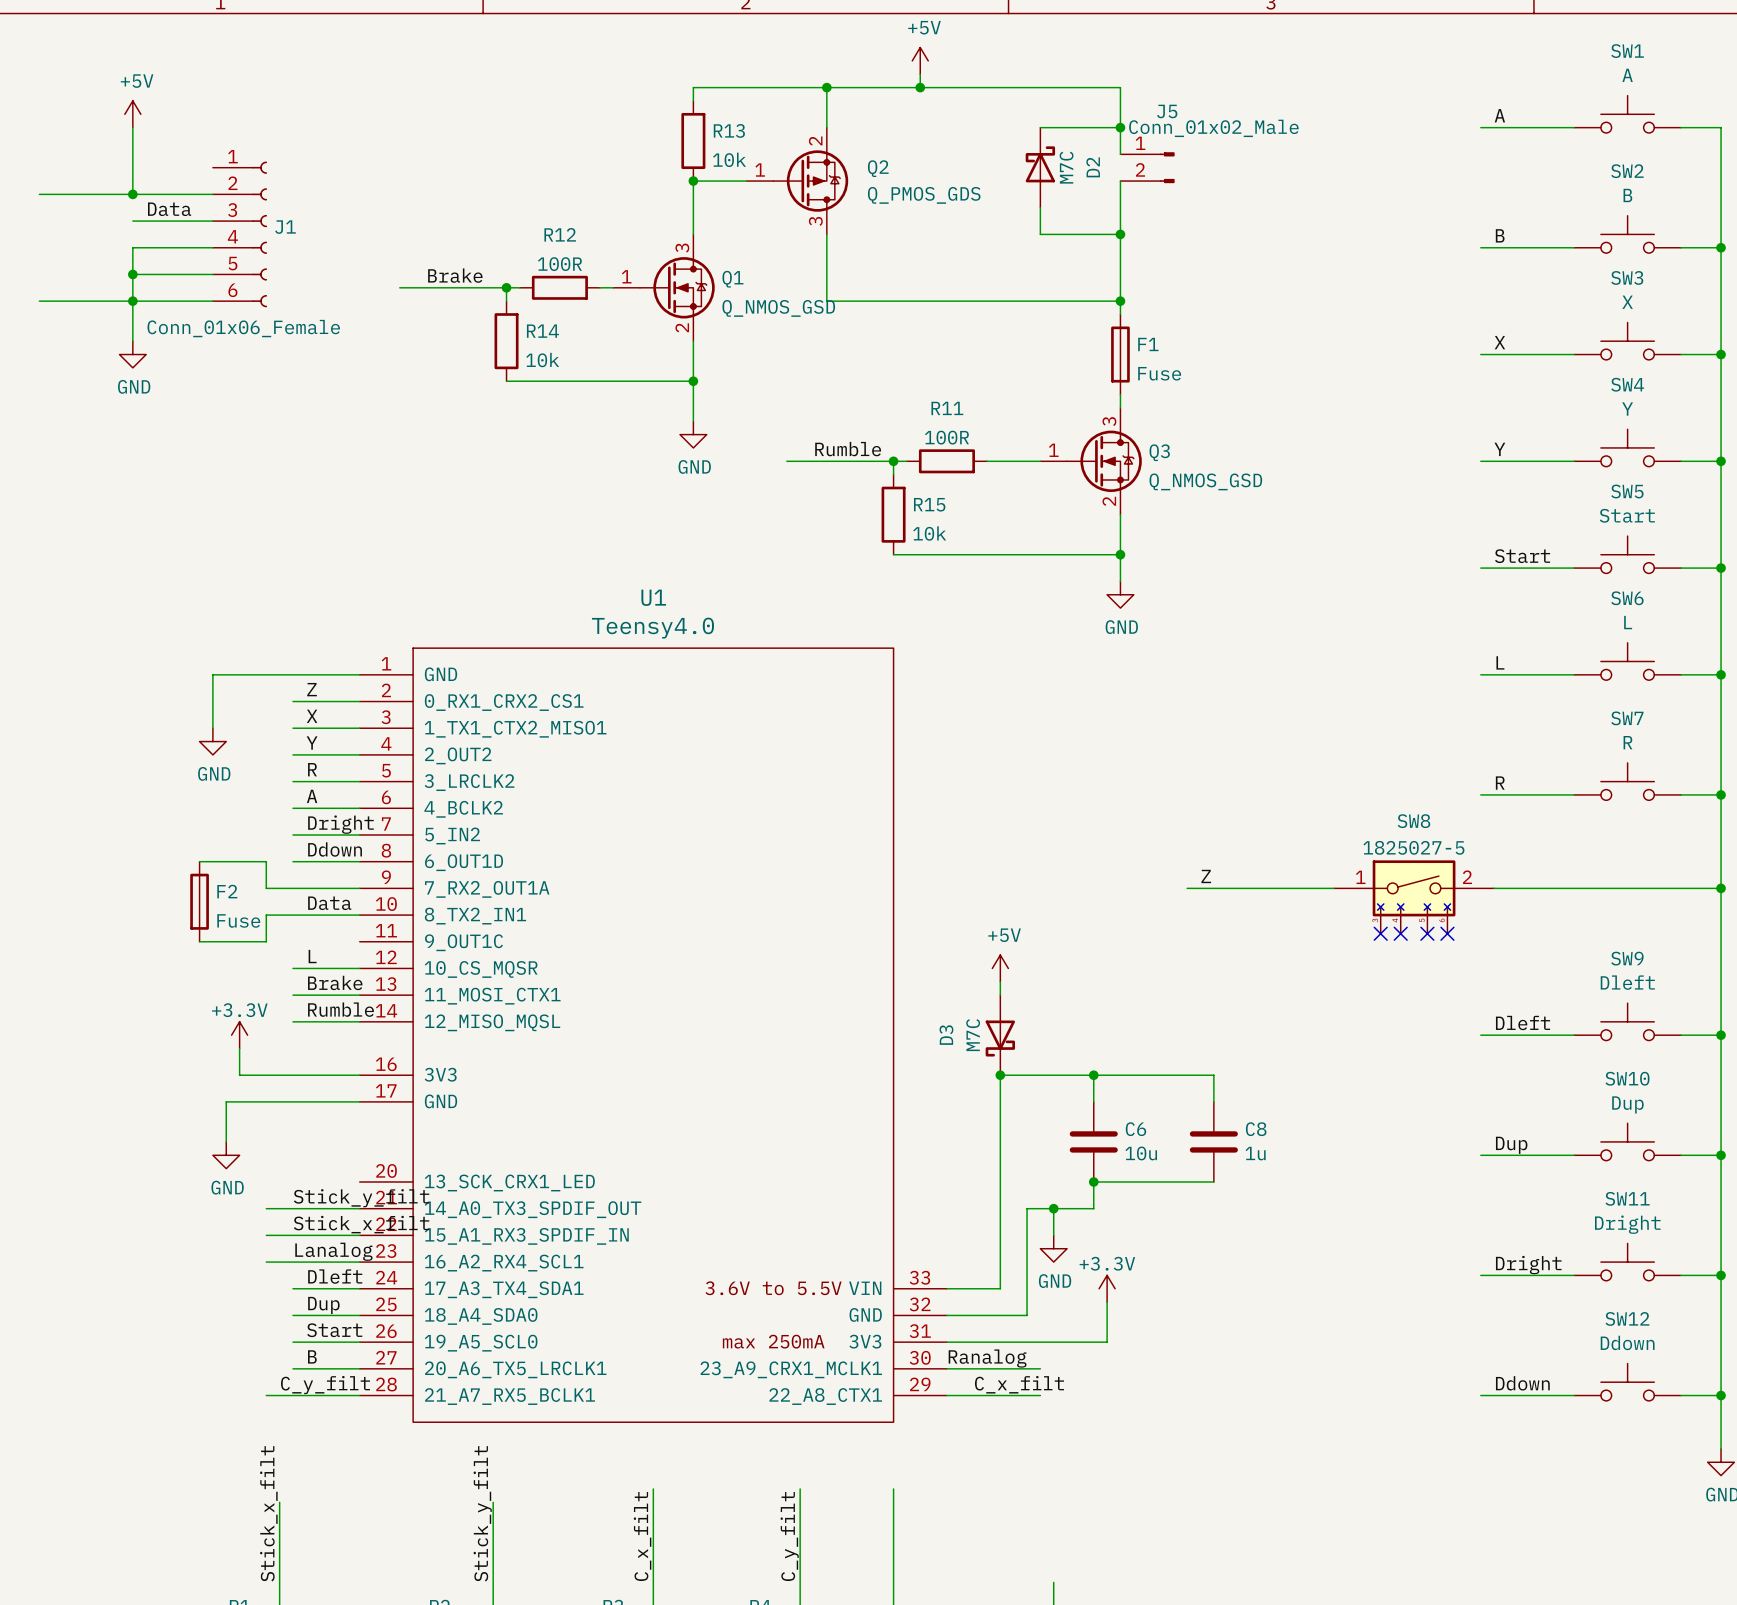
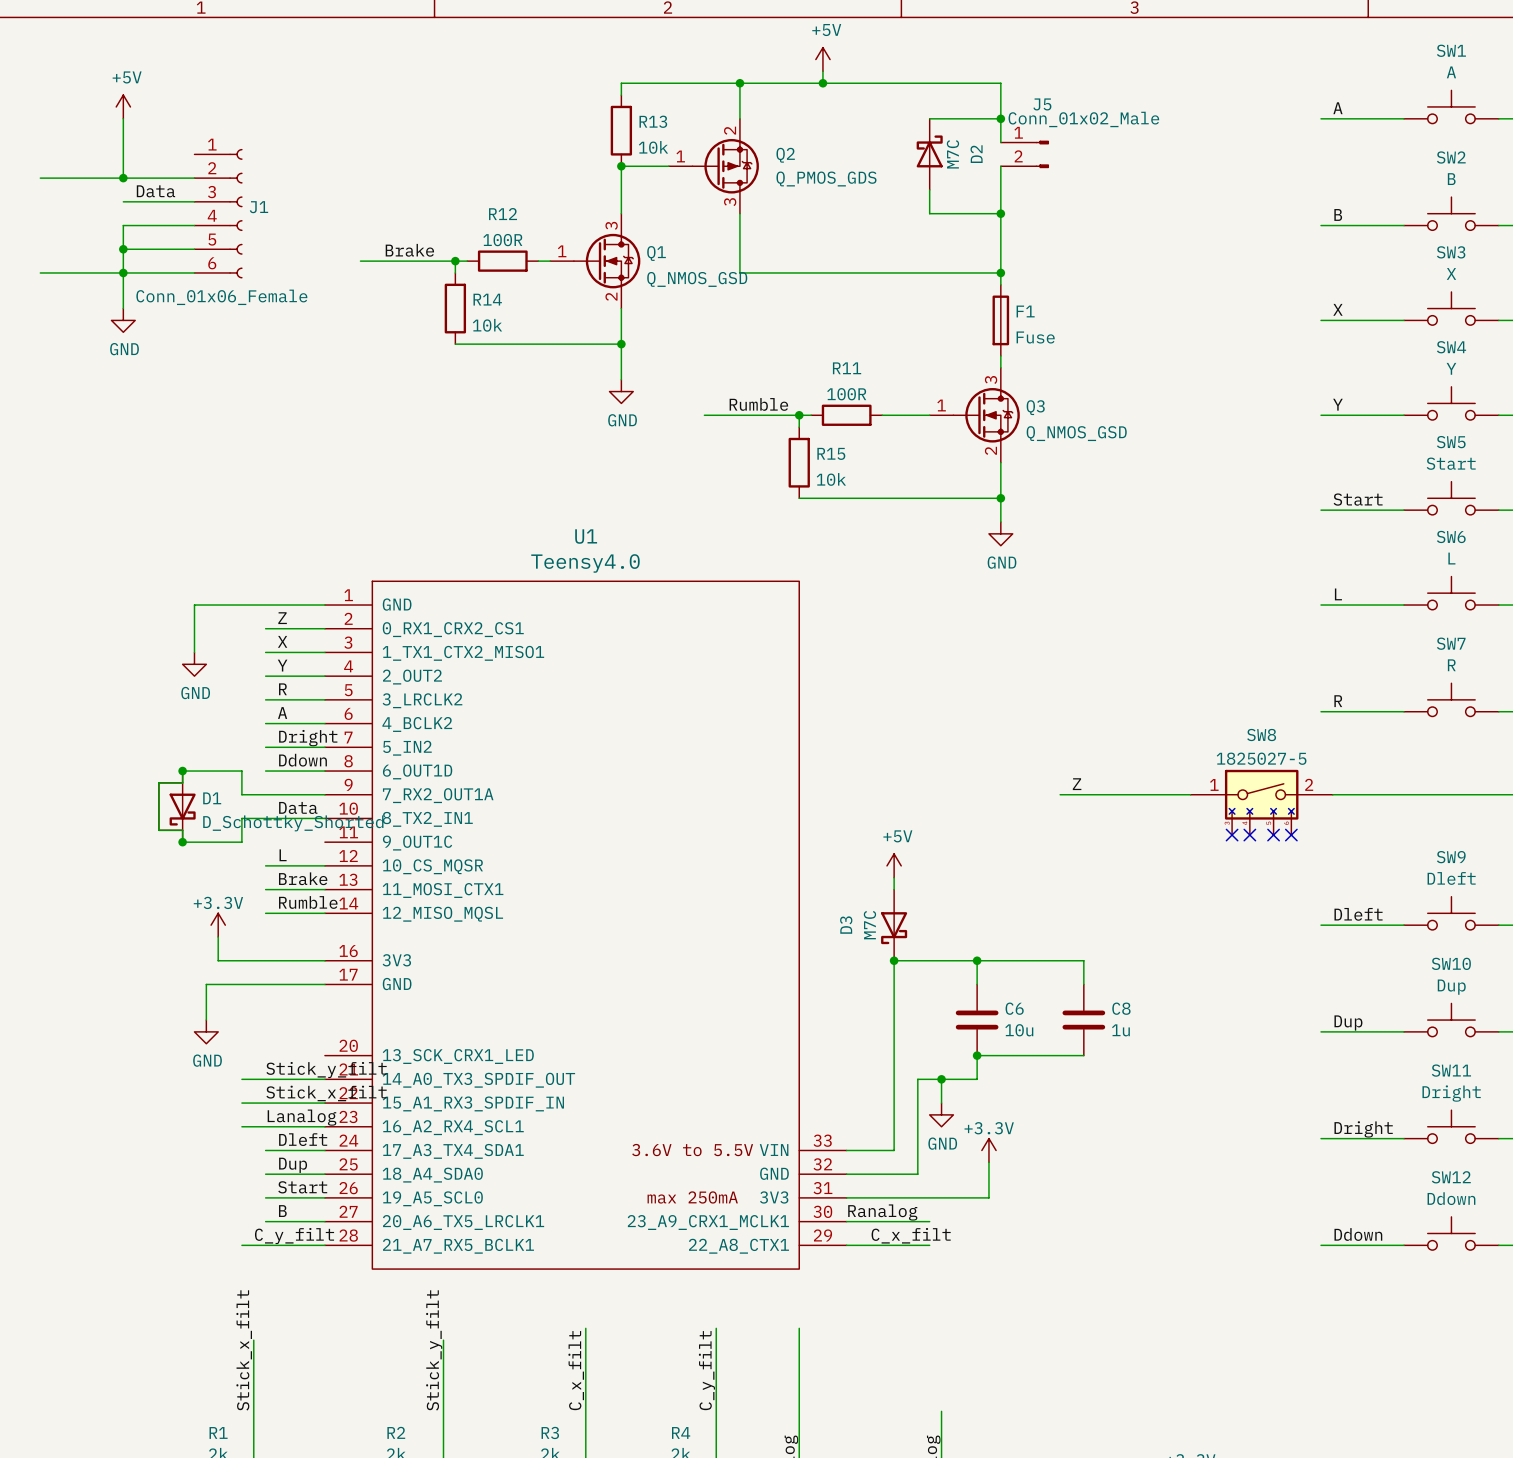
wire: none -> (182, 771) (182, 782) (158, 782) (158, 830) (182, 830) (182, 842)
junction: none -> (182, 771)
D1: none -> D_Schottky_Shorted (177, 806)
F2: Fuse (199, 901) -> none
junction: none -> (182, 842)

